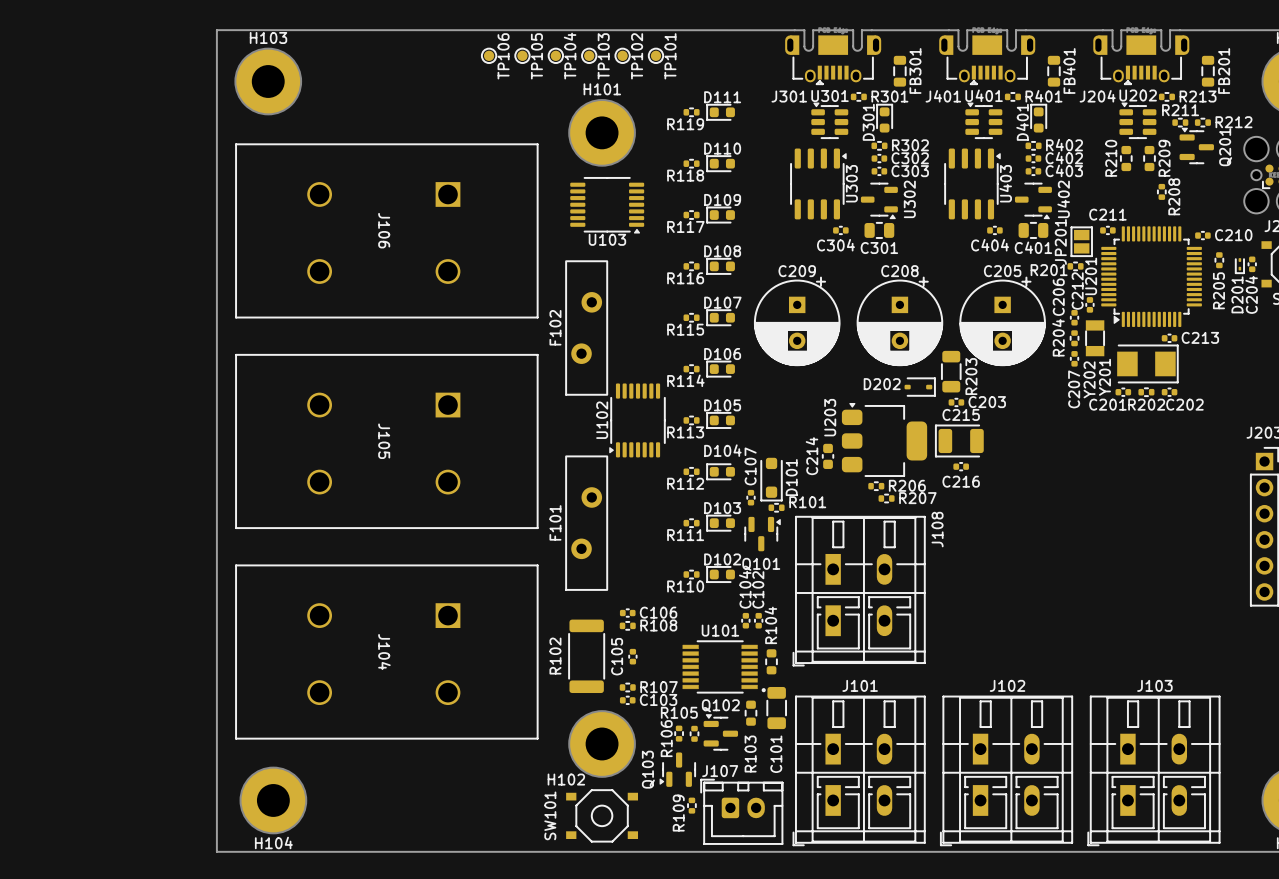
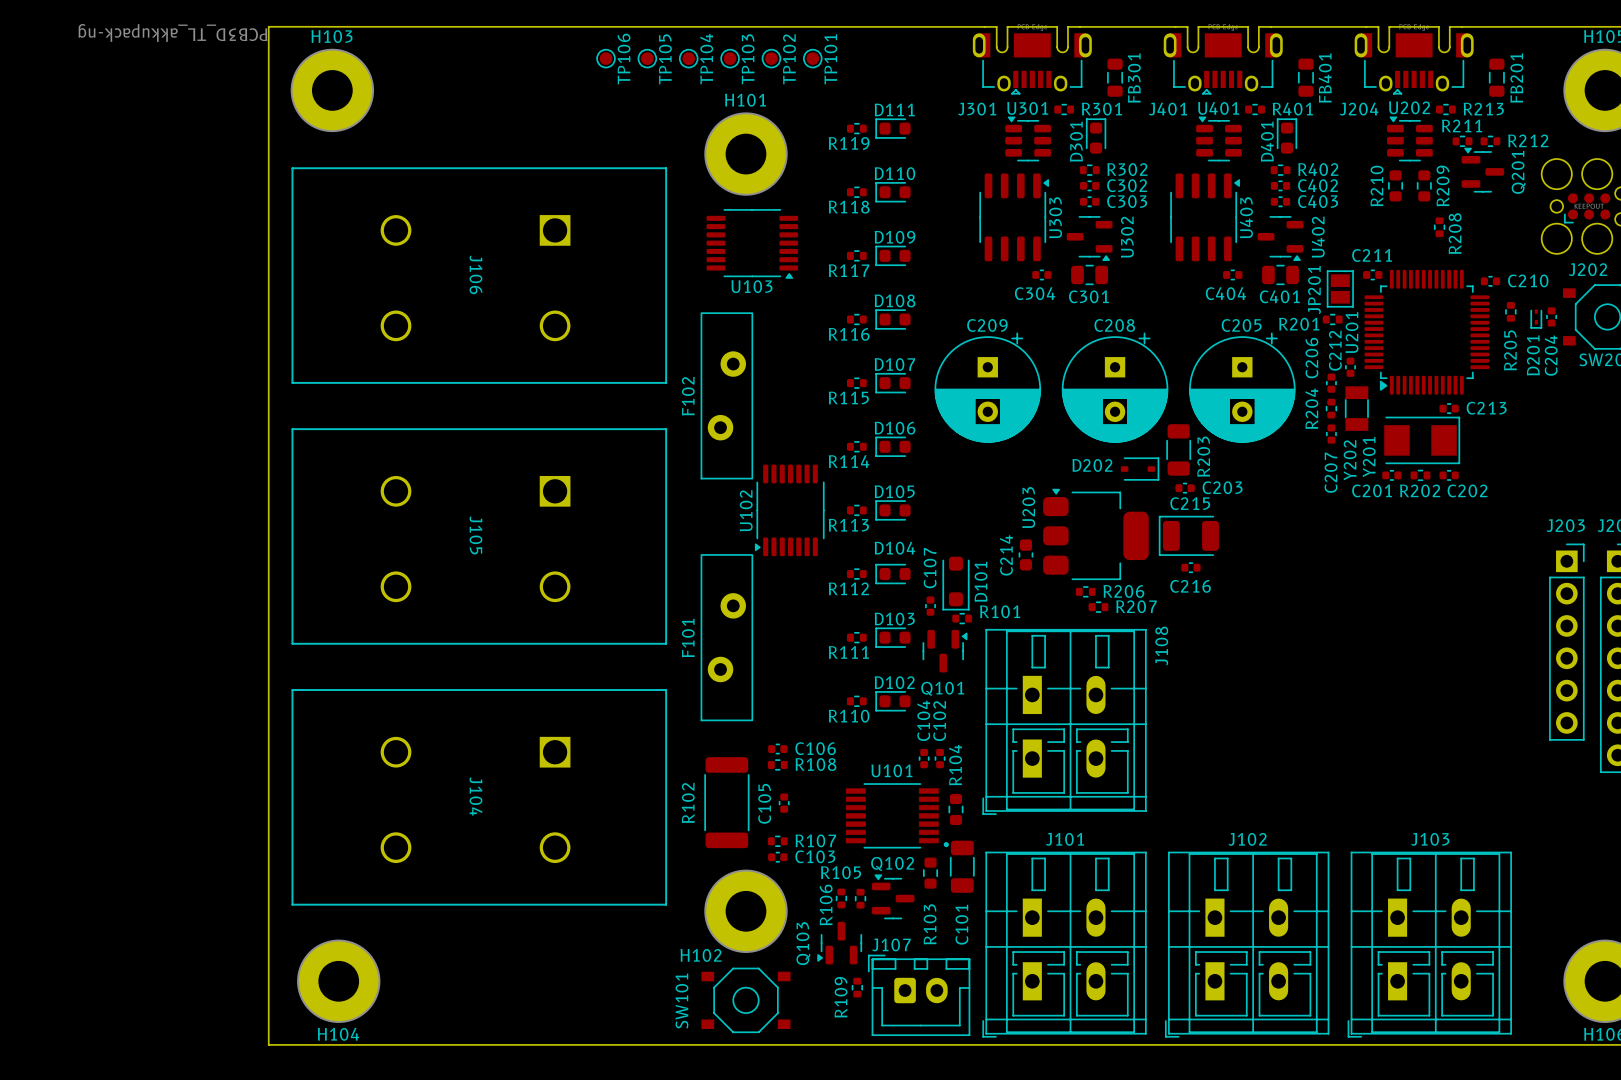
text: none -> PCB3D_TL_akkupack-ng (173, 32)

